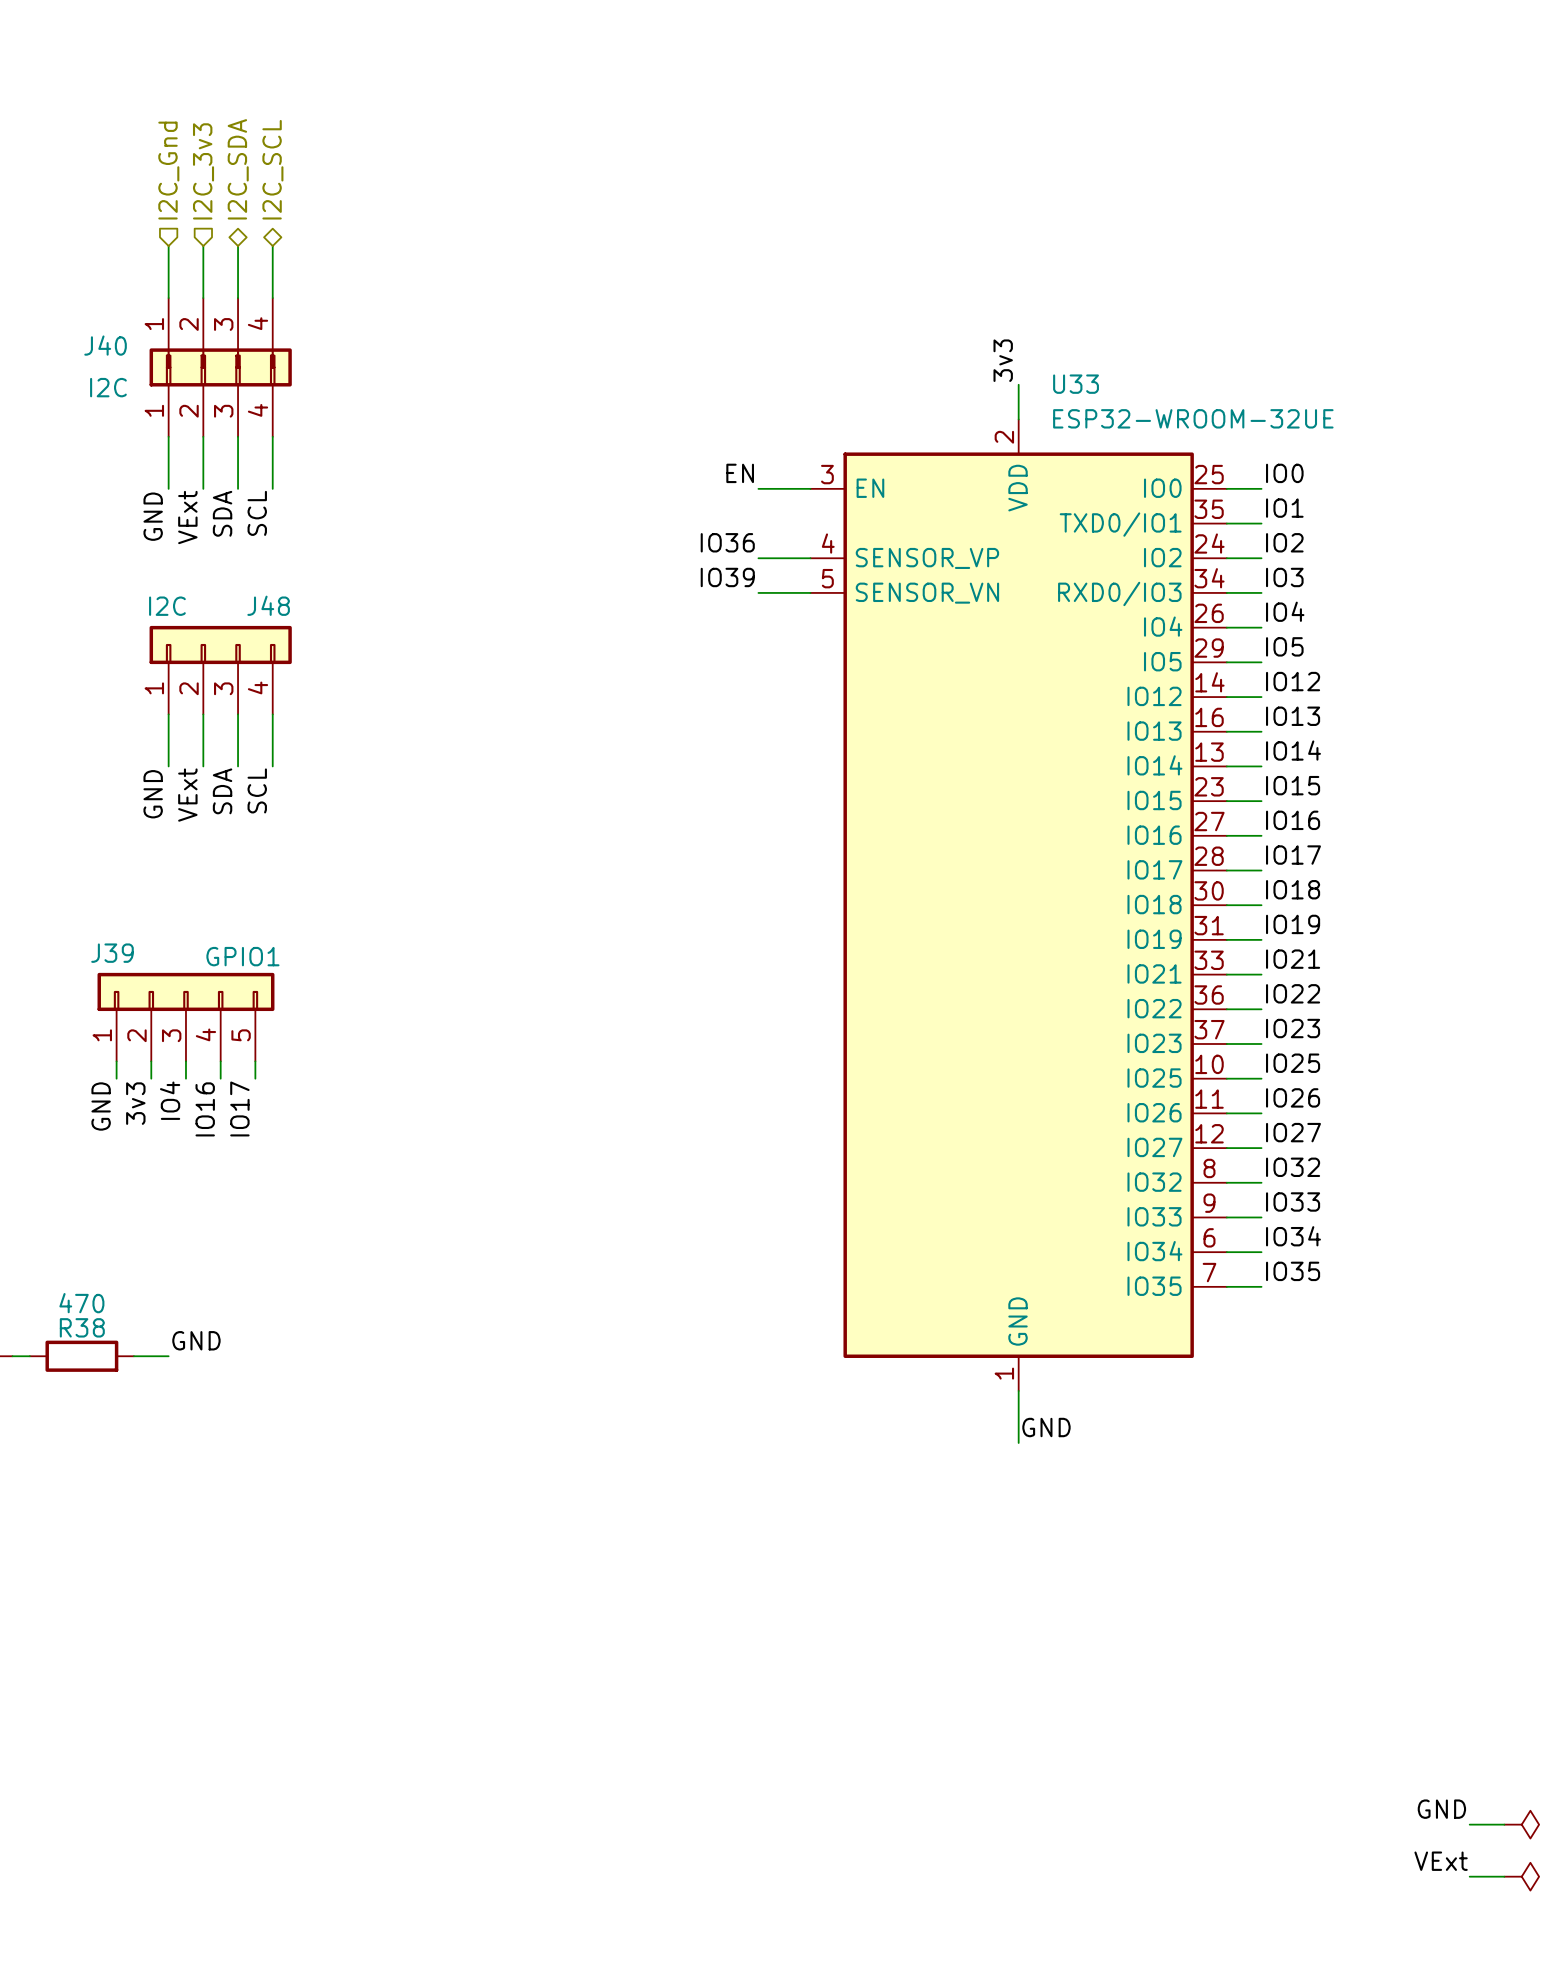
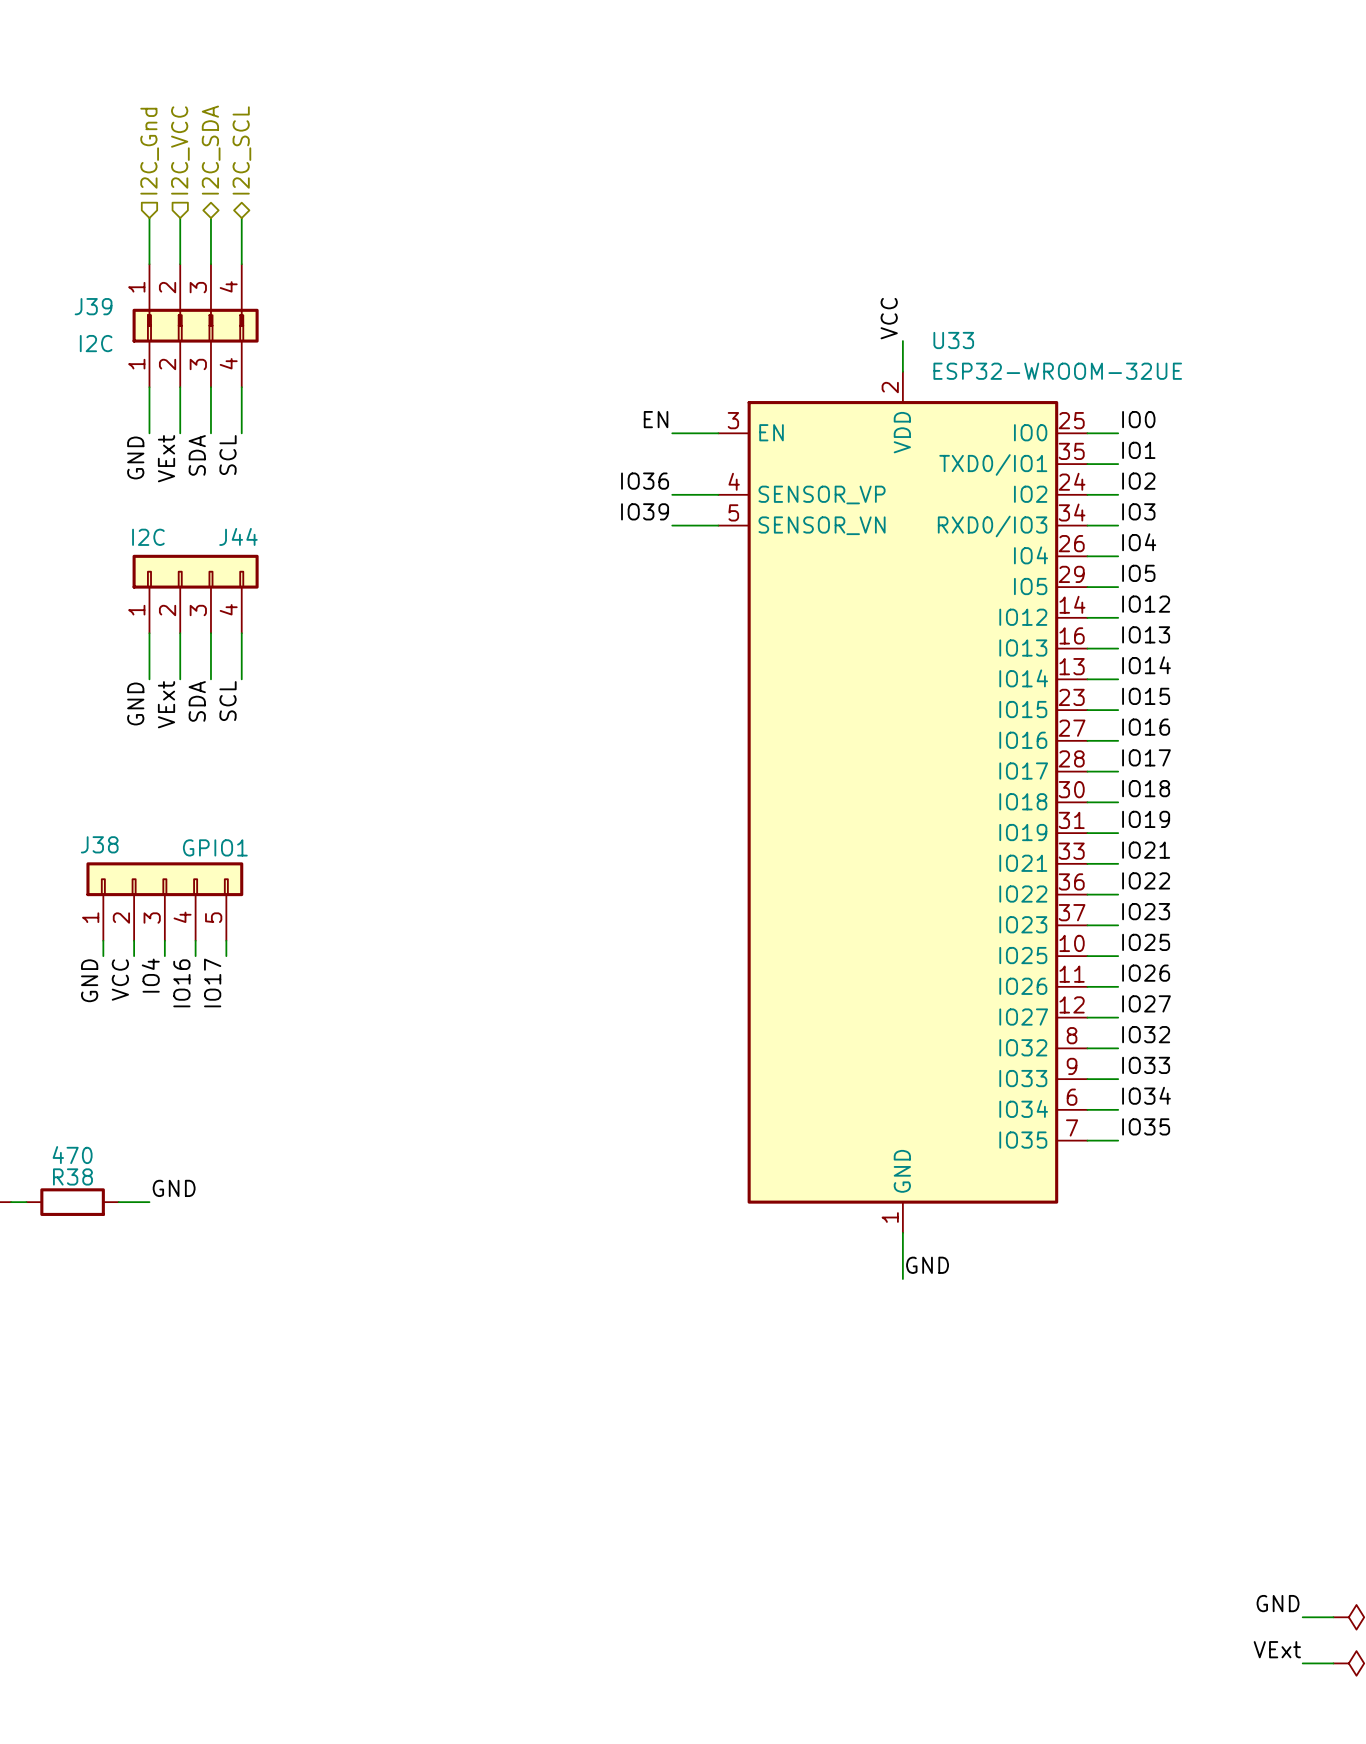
hierarchical label: I2C_3v3 (203, 171) -> I2C_VCC (180, 150)
J40 name: J40 (105, 345) -> J39 (93, 306)
label: 3v3 (1003, 360) -> VCC (889, 318)
J48 name: J48 (268, 605) -> J44 (238, 536)
J39 name: J39 (112, 953) -> J38 (99, 844)
label: 3v3 (135, 1103) -> VCC (120, 980)

